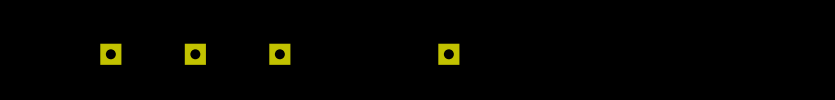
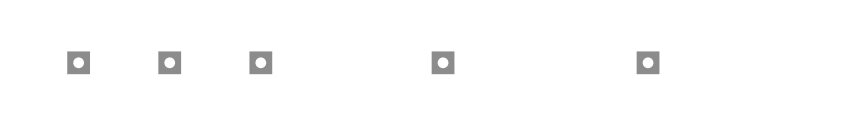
part: none -> (648, 62)

